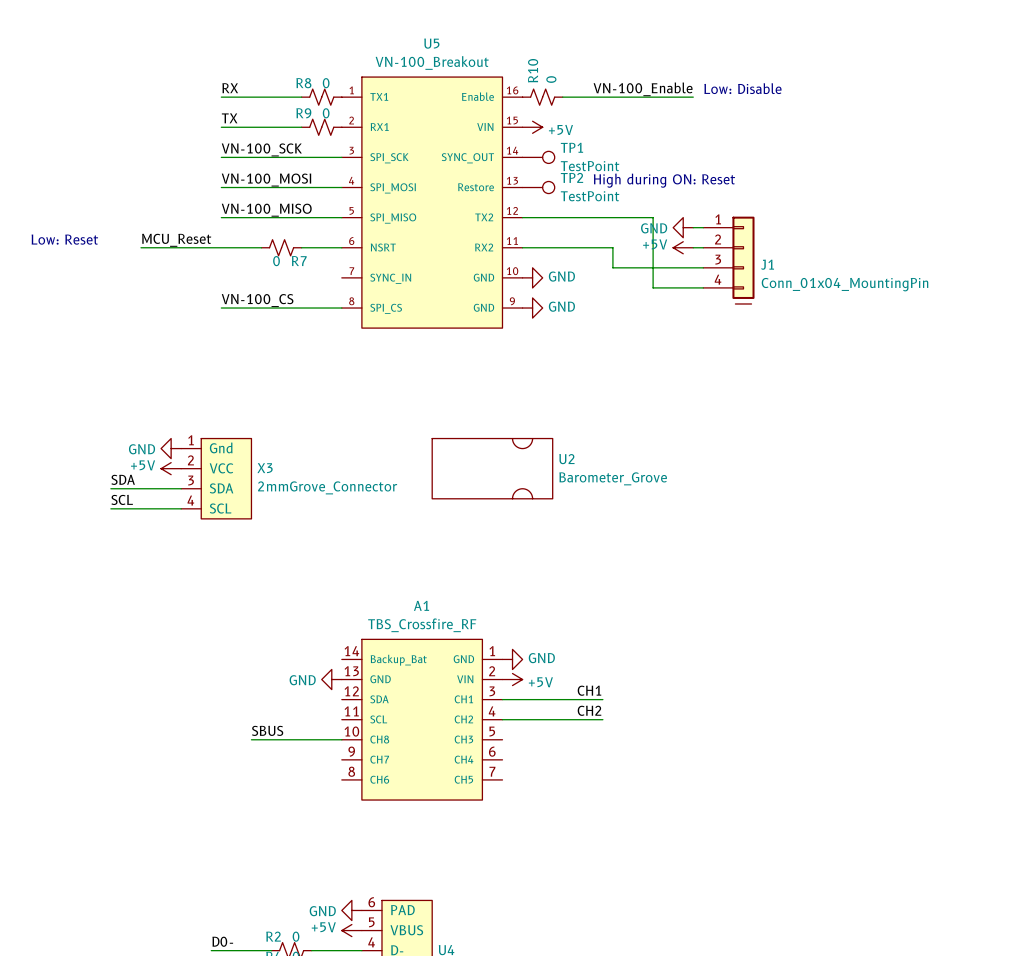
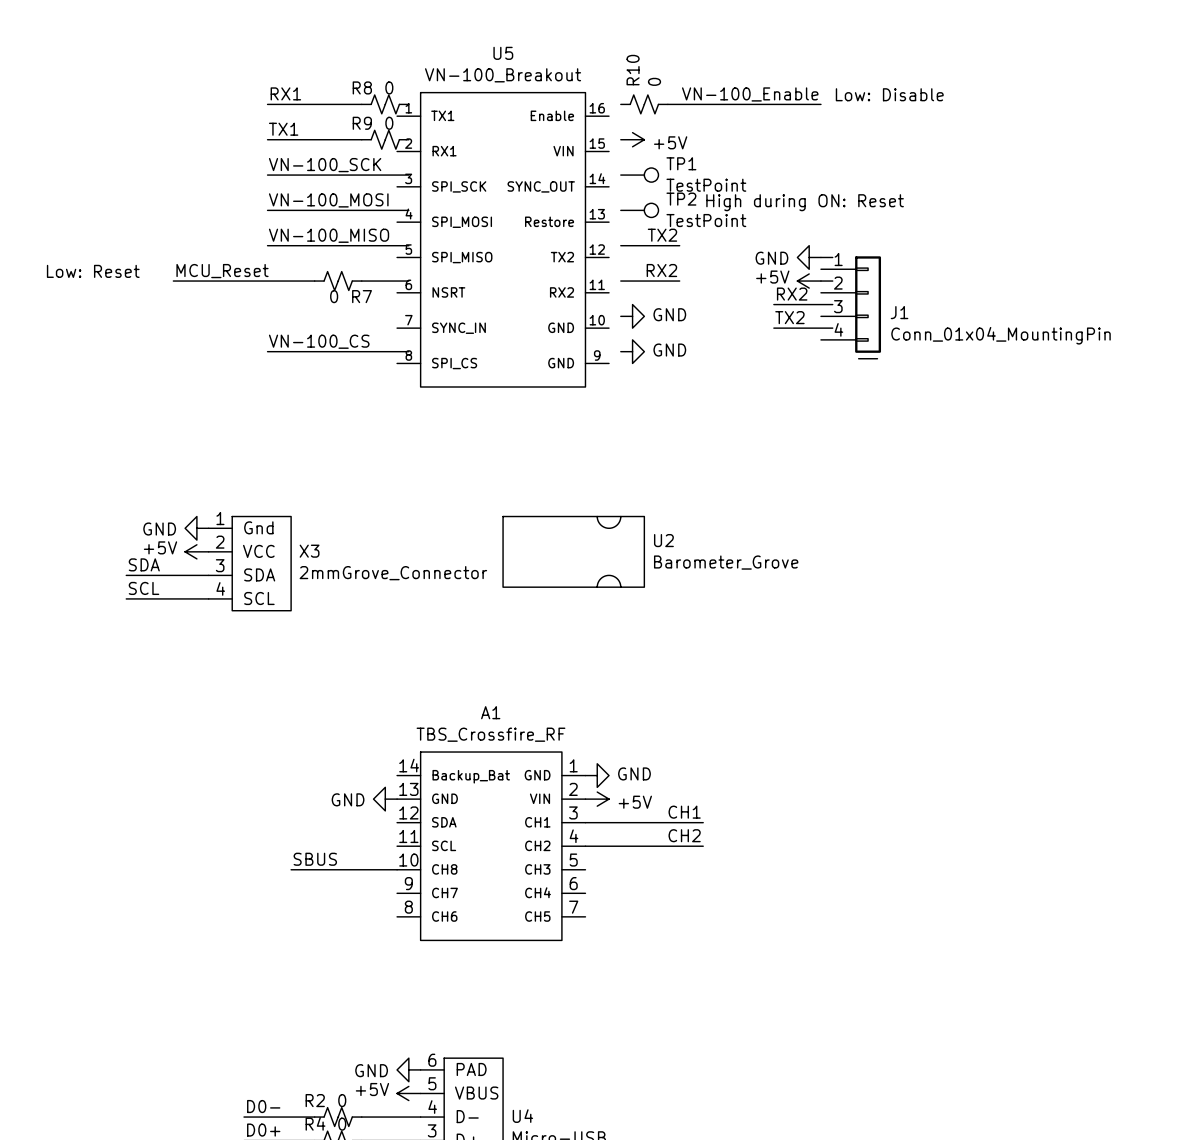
label: RX (230, 88) -> RX1 (285, 93)
text position: Low: Disable (742, 88) -> Low: Disable (889, 94)
label position: VN-100_Enable (643, 89) -> VN-100_Enable (750, 94)
wire: (221, 97) (301, 97) -> (267, 104) (361, 104)
R8 position: (321, 97) -> (385, 104)
R10 position: (542, 97) -> (644, 104)
wire: (562, 97) (693, 97) -> (667, 104) (820, 104)
label: TX (229, 118) -> TX1 (283, 129)
wire: (221, 127) (301, 127) -> (267, 139) (361, 139)
R9 position: (321, 127) -> (385, 139)
power symbol position: +5V (532, 127) -> +5V (632, 139)
label position: VN-100_SCK (261, 149) -> VN-100_SCK (325, 165)
wire: (221, 157) (341, 157) -> (267, 175) (408, 175)
TP1 position: (538, 157) -> (639, 175)
label position: VN-100_MOSI (266, 180) -> VN-100_MOSI (328, 200)
text position: High during ON: Reset (664, 180) -> High during ON: Reset (805, 202)
wire: (221, 187) (341, 187) -> (267, 210) (408, 210)
TP2 position: (538, 187) -> (639, 210)
label: none -> TX2 (662, 235)
wire: none -> (620, 245) (679, 245)
label position: VN-100_MISO (266, 210) -> VN-100_MISO (329, 235)
wire: (221, 217) (341, 217) -> (267, 245) (408, 245)
wire: (522, 217) (653, 217) (653, 287) (703, 287) -> none
power symbol position: GND (683, 227) -> GND (809, 257)
wire: (693, 227) (703, 227) -> (820, 257) (832, 257)
label: none -> RX2 (661, 270)
wire: none -> (620, 281) (679, 281)
text position: Low: Reset (64, 239) -> Low: Reset (93, 271)
label position: MCU_Reset (176, 240) -> MCU_Reset (222, 271)
wire: (141, 247) (261, 247) -> (173, 281) (314, 281)
R7 position: (281, 247) -> (338, 281)
wire: (301, 247) (341, 247) -> (361, 281) (408, 281)
wire: (522, 247) (612, 247) (612, 267) (703, 267) -> none
power symbol position: +5V (683, 247) -> +5V (809, 281)
wire: (693, 247) (703, 247) -> (820, 281) (832, 281)
label: none -> RX2 (792, 294)
wire: none -> (773, 304) (832, 304)
power symbol: none -> GND (632, 316)
label: none -> TX2 (789, 317)
power symbol: GND (532, 277) -> none
wire: none -> (773, 328) (832, 328)
power symbol: none -> GND (632, 351)
label position: VN-100_CS (257, 300) -> VN-100_CS (319, 341)
wire: (221, 308) (341, 308) -> (267, 351) (408, 351)
power symbol: GND (532, 308) -> none

